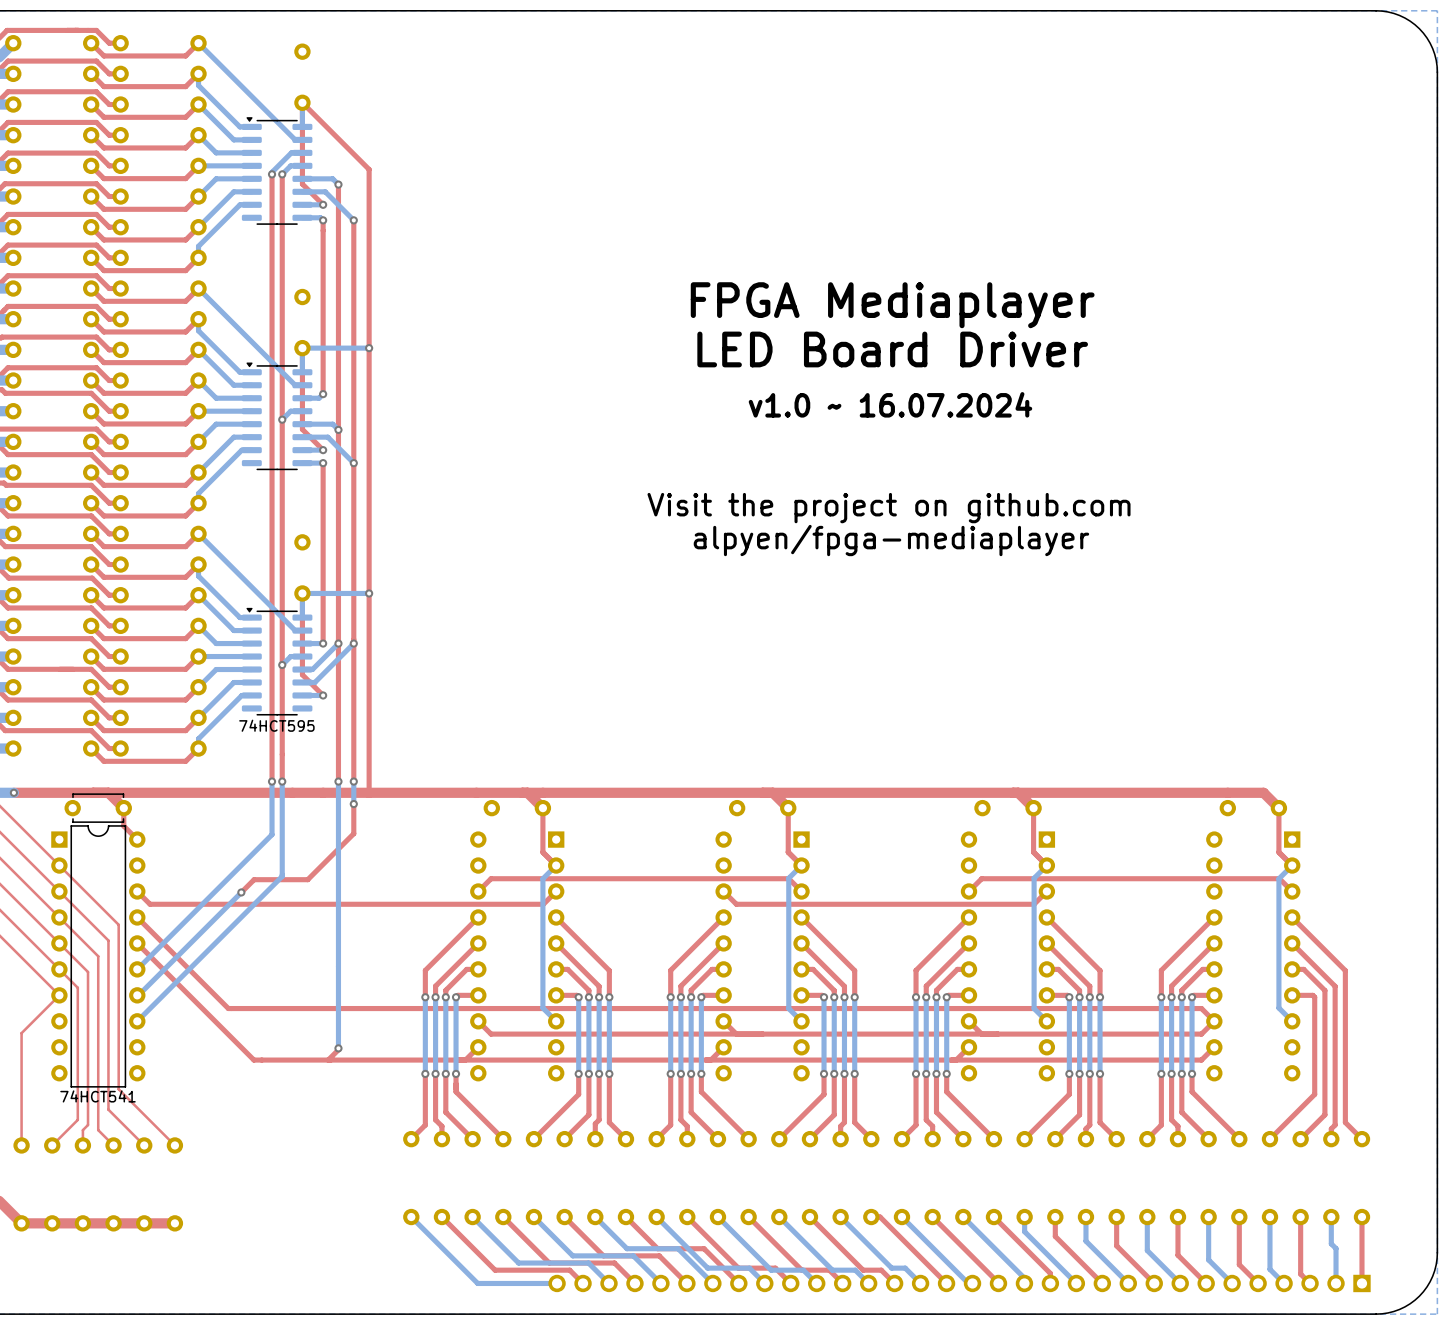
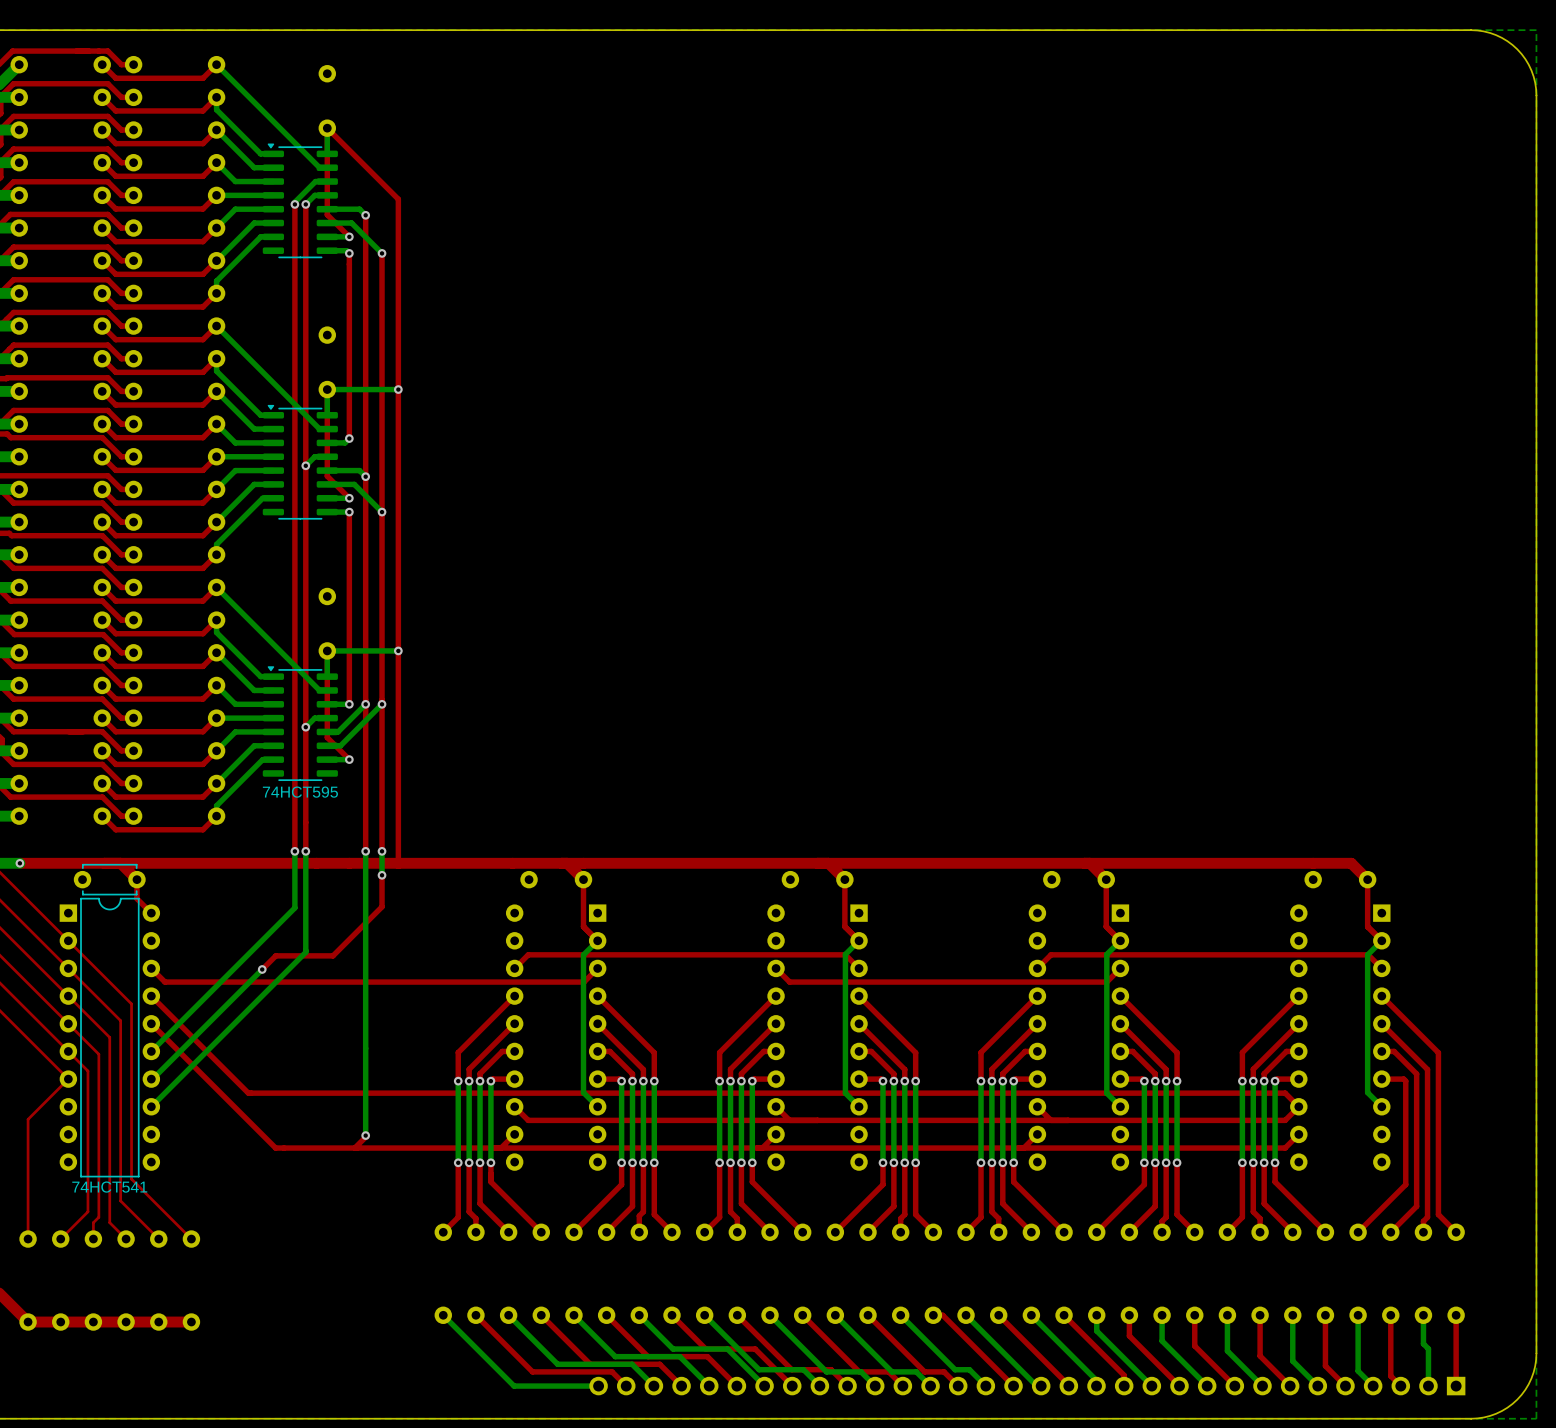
text: FPGA Mediaplayer (892, 305) -> none
text: LED Board Driver (892, 349) -> none
text: v1.0 ~ 16.07.2024 (890, 404) -> none
text: Visit the project on github.com (889, 508) -> none
text: alpyen/fpga-mediaplayer (891, 540) -> none

